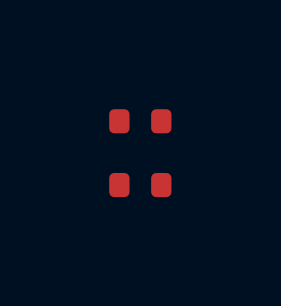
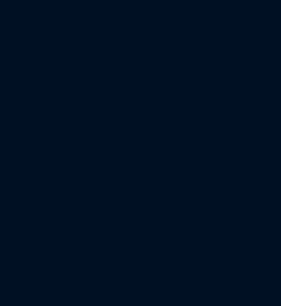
part: (140, 121) -> none
part: (140, 185) -> none

